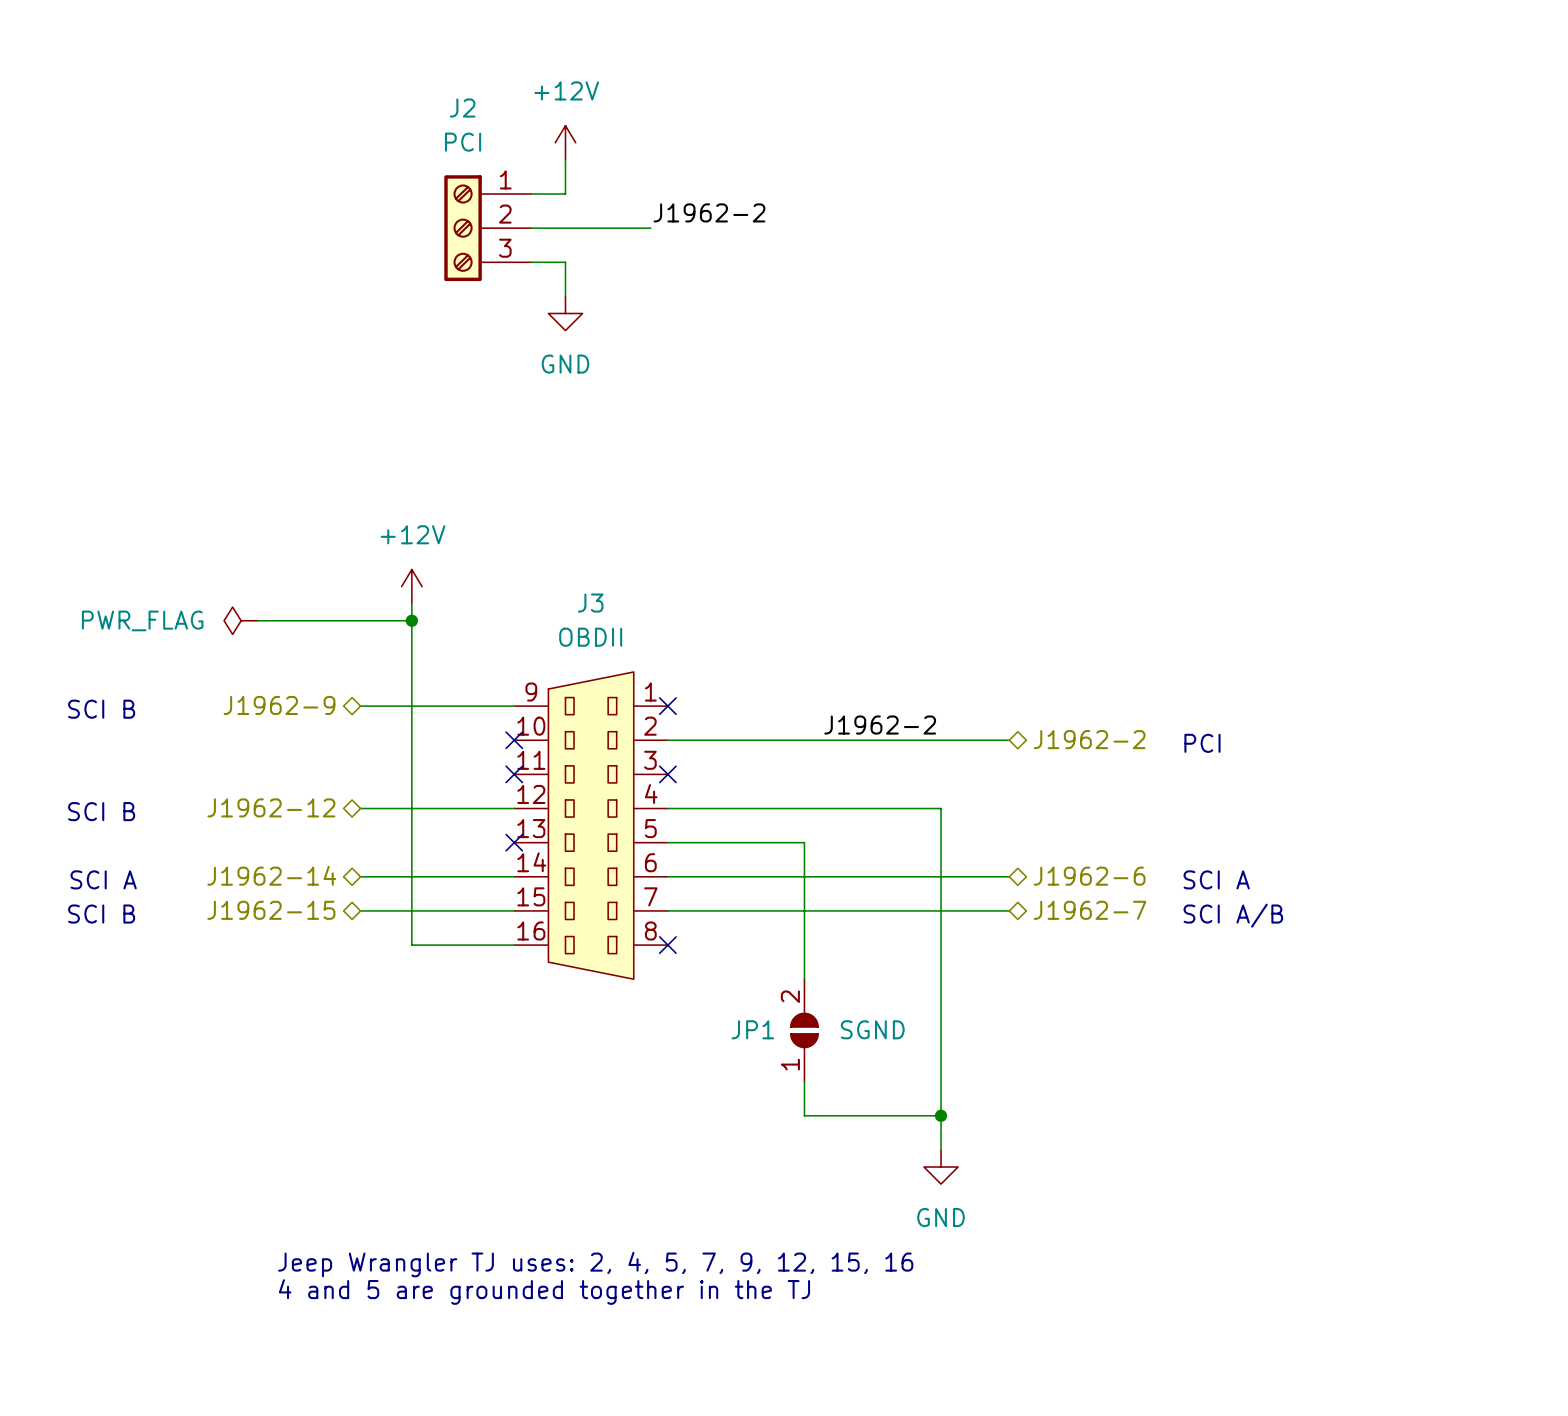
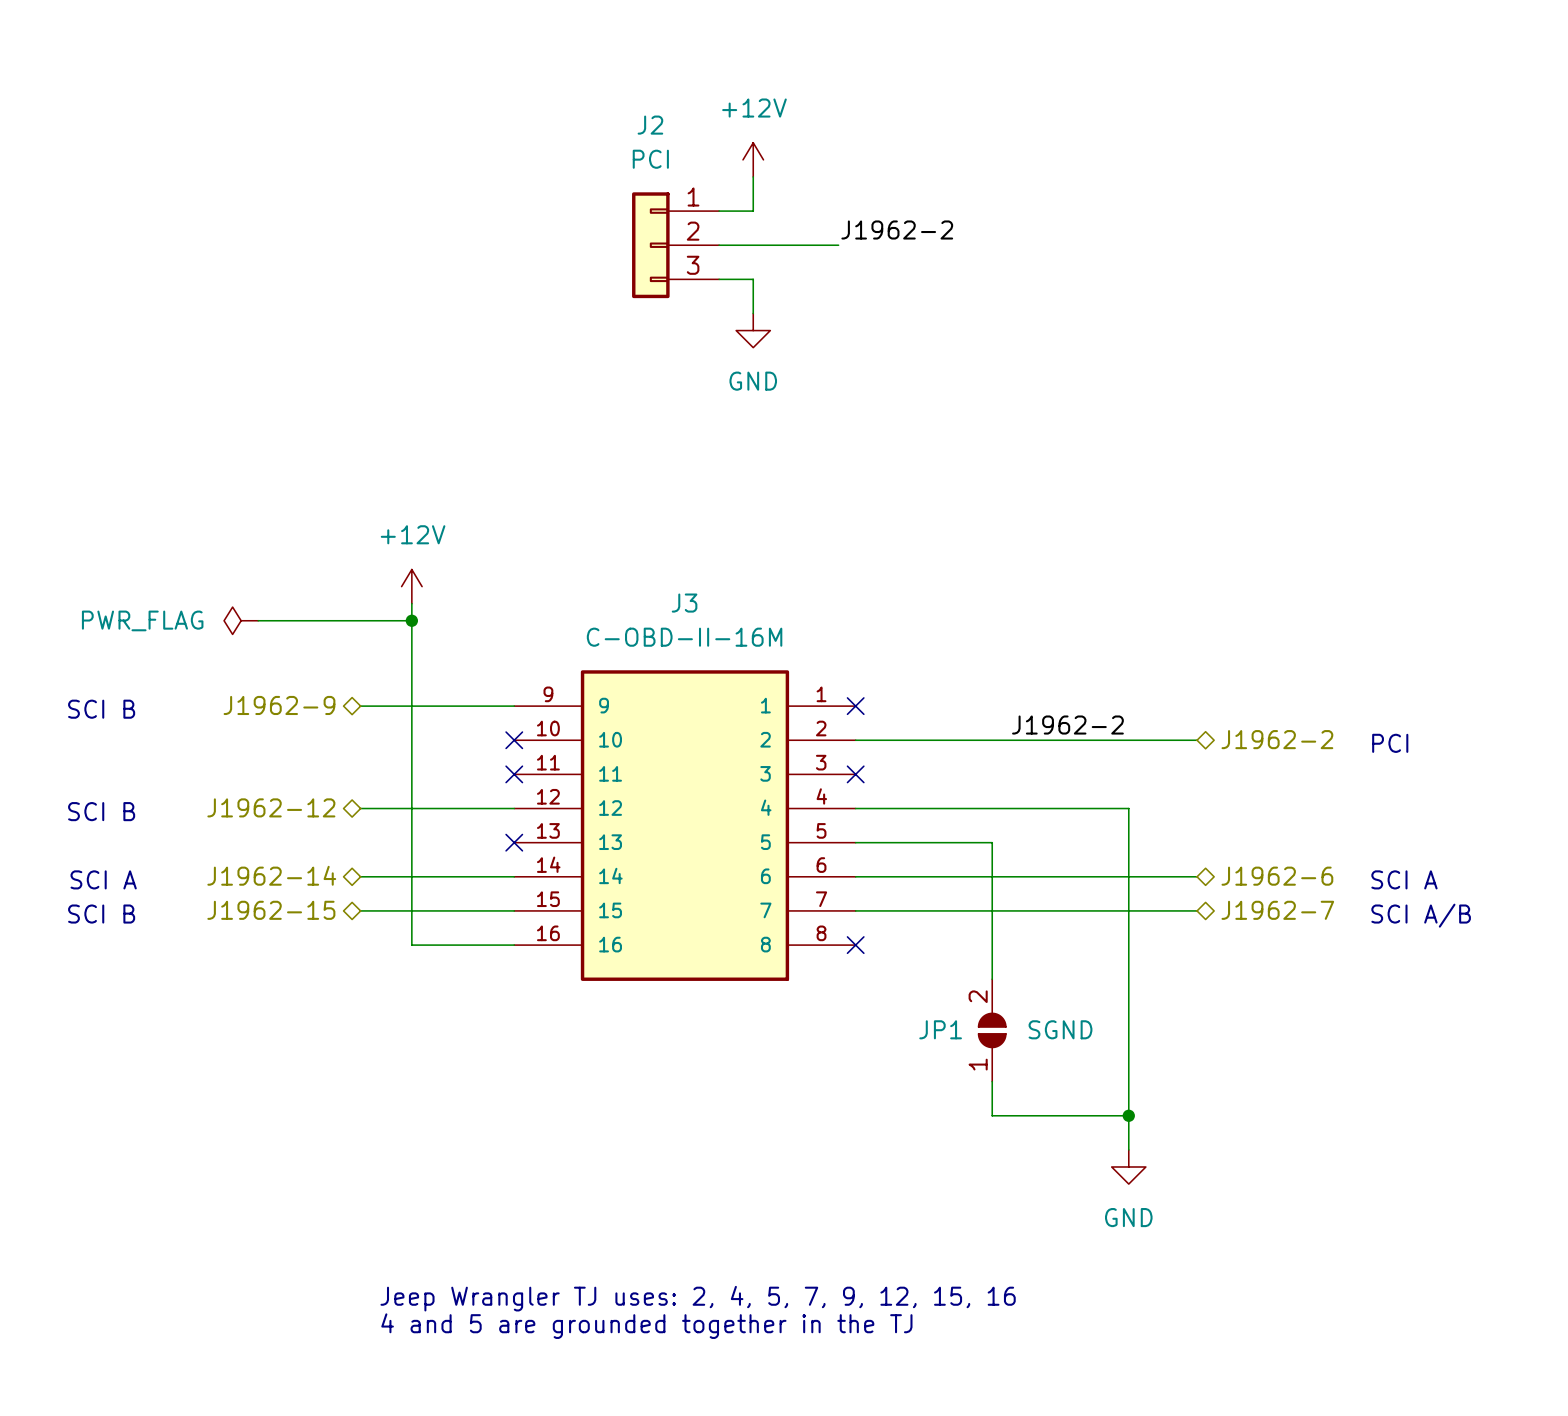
power symbol position: +12V (565, 142) -> +12V (753, 159)
wire: (565, 159) (565, 194) (531, 194) -> (753, 176) (753, 211) (719, 211)
J2 symbol: [444, 175, 532, 282] -> [632, 192, 720, 299]
label position: J1962-2 (709, 212) -> J1962-2 (897, 229)
wire: (531, 228) (650, 228) -> (719, 245) (838, 245)
wire: (531, 262) (565, 262) (565, 296) -> (719, 279) (753, 279) (753, 313)
power symbol position: GND (565, 313) -> GND (753, 330)
J3 value: OBDII (590, 637) -> C-OBD-II-16M (684, 637)
J3 symbol: [514, 671, 668, 980] -> [514, 670, 856, 981]
no-connect mark: (667, 706) -> none
no-connect mark: none -> (855, 706)
label position: J1962-2 (880, 725) -> J1962-2 (1067, 725)
hierarchical label position: J1962-2 (1089, 739) -> J1962-2 (1277, 739)
wire: none -> (1009, 740) (1197, 740)
text position: PCI (1202, 743) -> PCI (1390, 743)
no-connect mark: (667, 774) -> none
no-connect mark: none -> (855, 774)
wire: (941, 808) (941, 1149) -> (941, 808) (1128, 808) (1128, 1149)
wire: (667, 842) (804, 842) (804, 979) -> (855, 842) (992, 842) (992, 979)
wire: none -> (1009, 876) (1197, 876)
hierarchical label position: J1962-6 (1089, 876) -> J1962-6 (1277, 876)
text position: SCI A (1216, 879) -> SCI A (1404, 879)
wire: none -> (1009, 910) (1197, 910)
hierarchical label position: J1962-7 (1090, 910) -> J1962-7 (1277, 910)
text position: SCI A/B (1233, 915) -> SCI A/B (1421, 915)
no-connect mark: (667, 945) -> none
no-connect mark: none -> (855, 945)
JP1 position: (804, 1030) -> (992, 1030)
wire: (804, 1081) (804, 1115) (941, 1115) -> (992, 1081) (992, 1115) (1128, 1115)
junction: (941, 1115) -> none
junction: none -> (1128, 1115)
power symbol position: GND (941, 1166) -> GND (1128, 1166)
text position: Jeep Wrangler TJ uses: 2, 4, 5, 7, 9, 12, 15, 16 (595, 1264) -> Jeep Wrangler TJ uses: 2, 4, 5, 7, 9, 12, 15, 16 (698, 1298)
text position: 4 and 5 are grounded together in the TJ (544, 1292) -> 4 and 5 are grounded together in the TJ (646, 1326)

